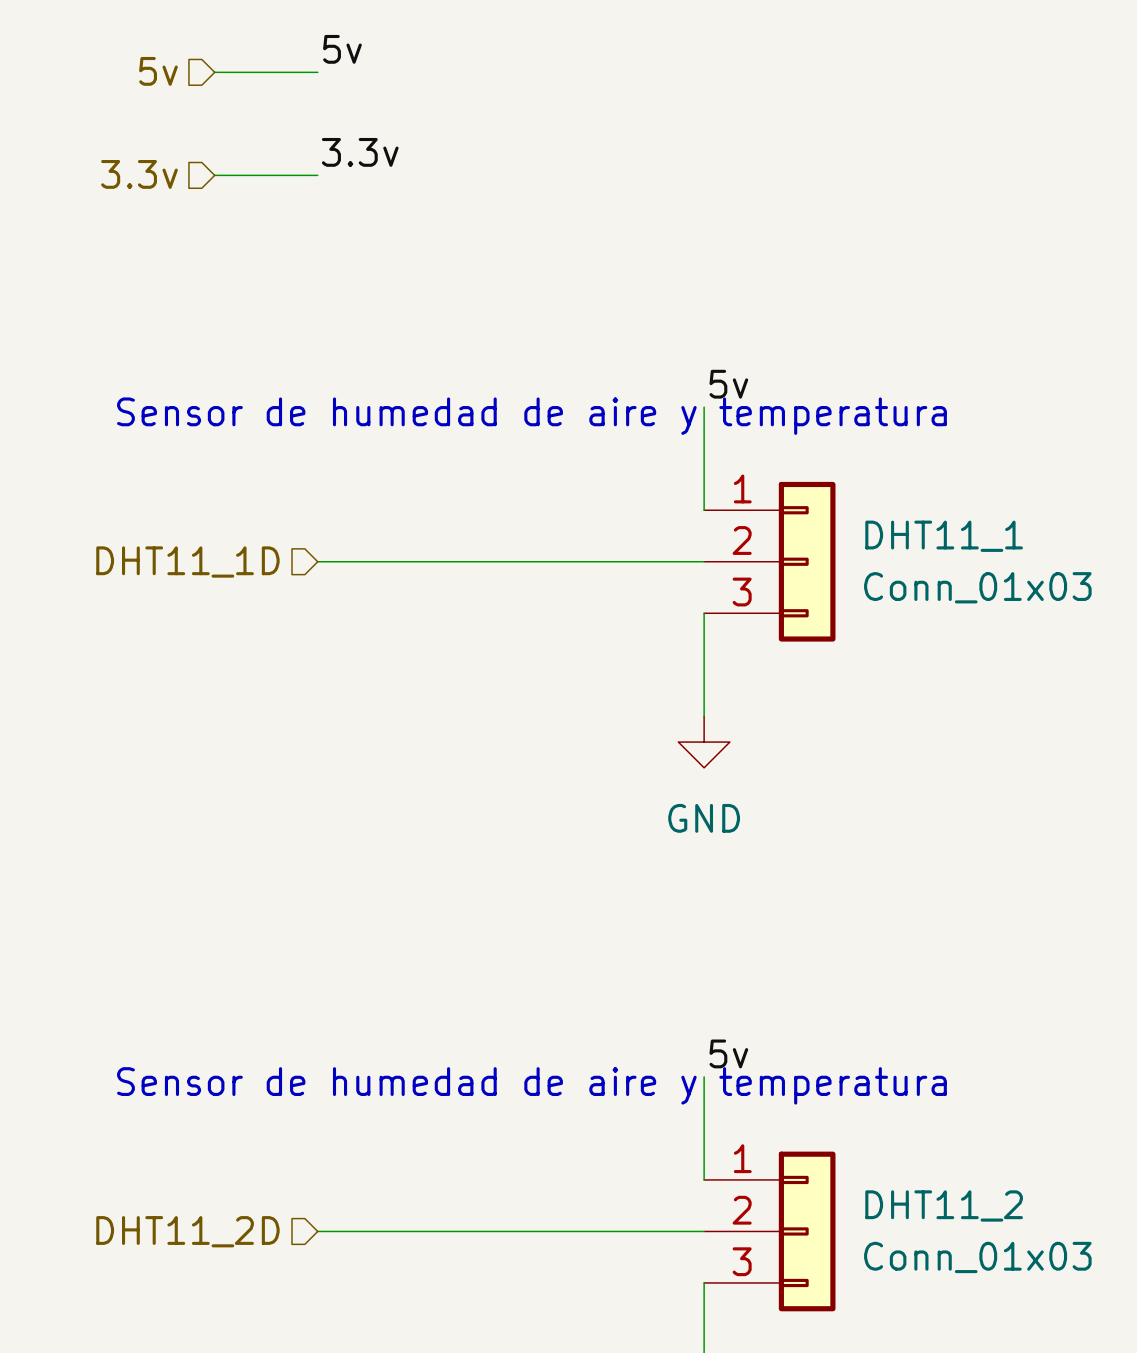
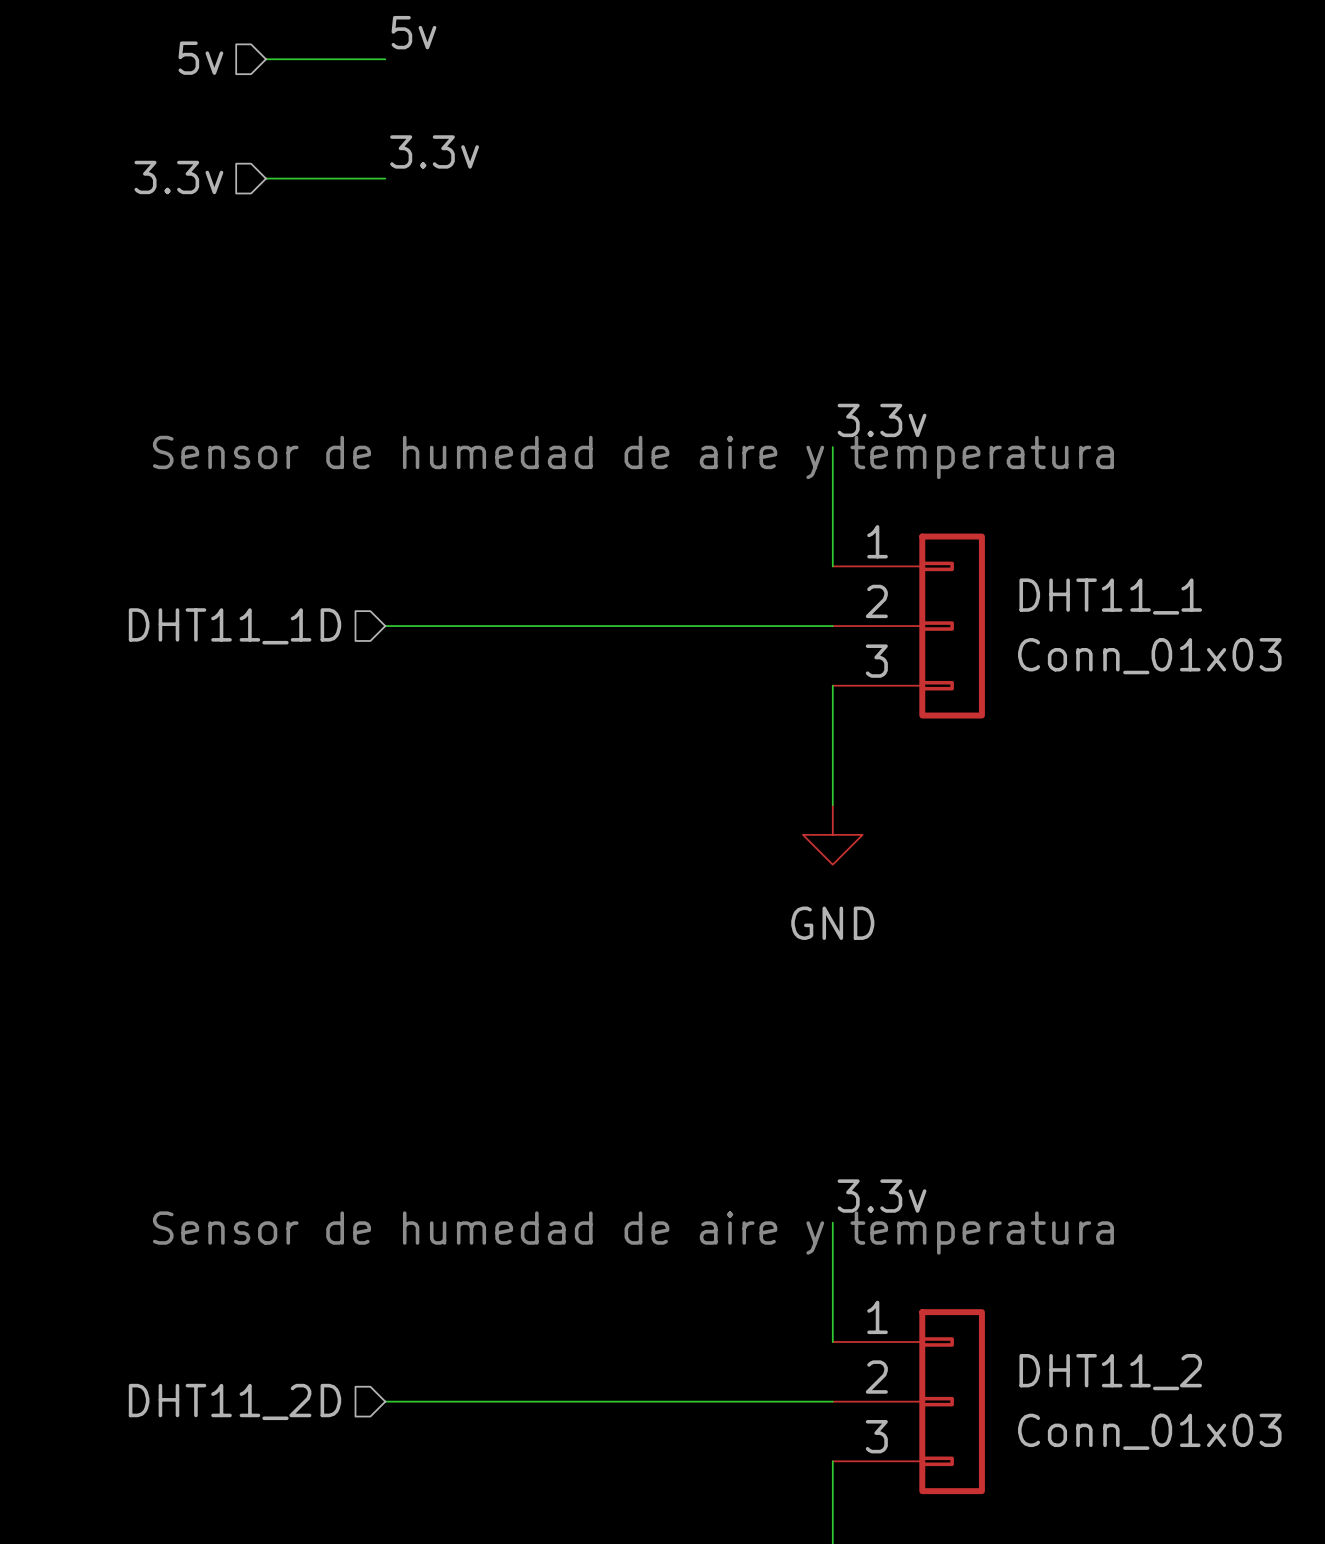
label: 5v (728, 384) -> 3.3v (882, 420)
label: 5v (728, 1053) -> 3.3v (882, 1196)

